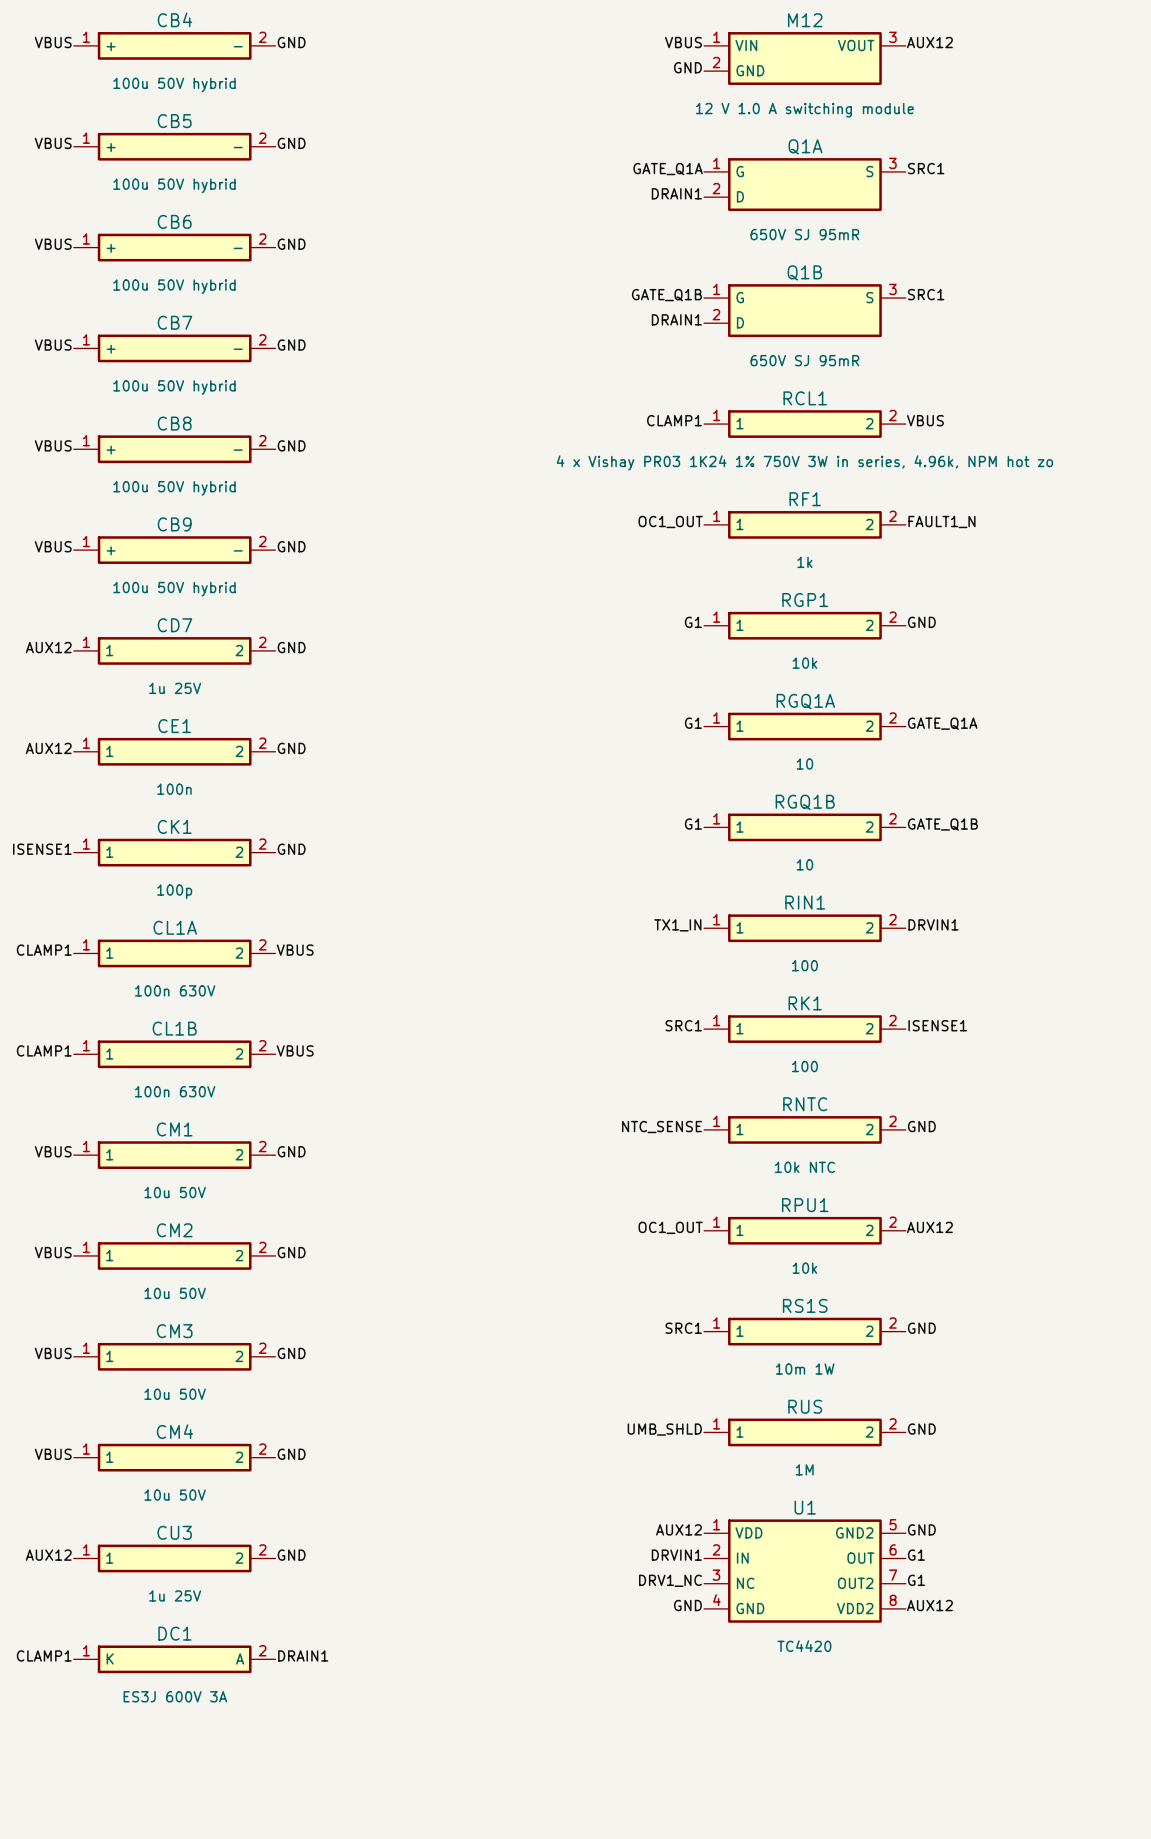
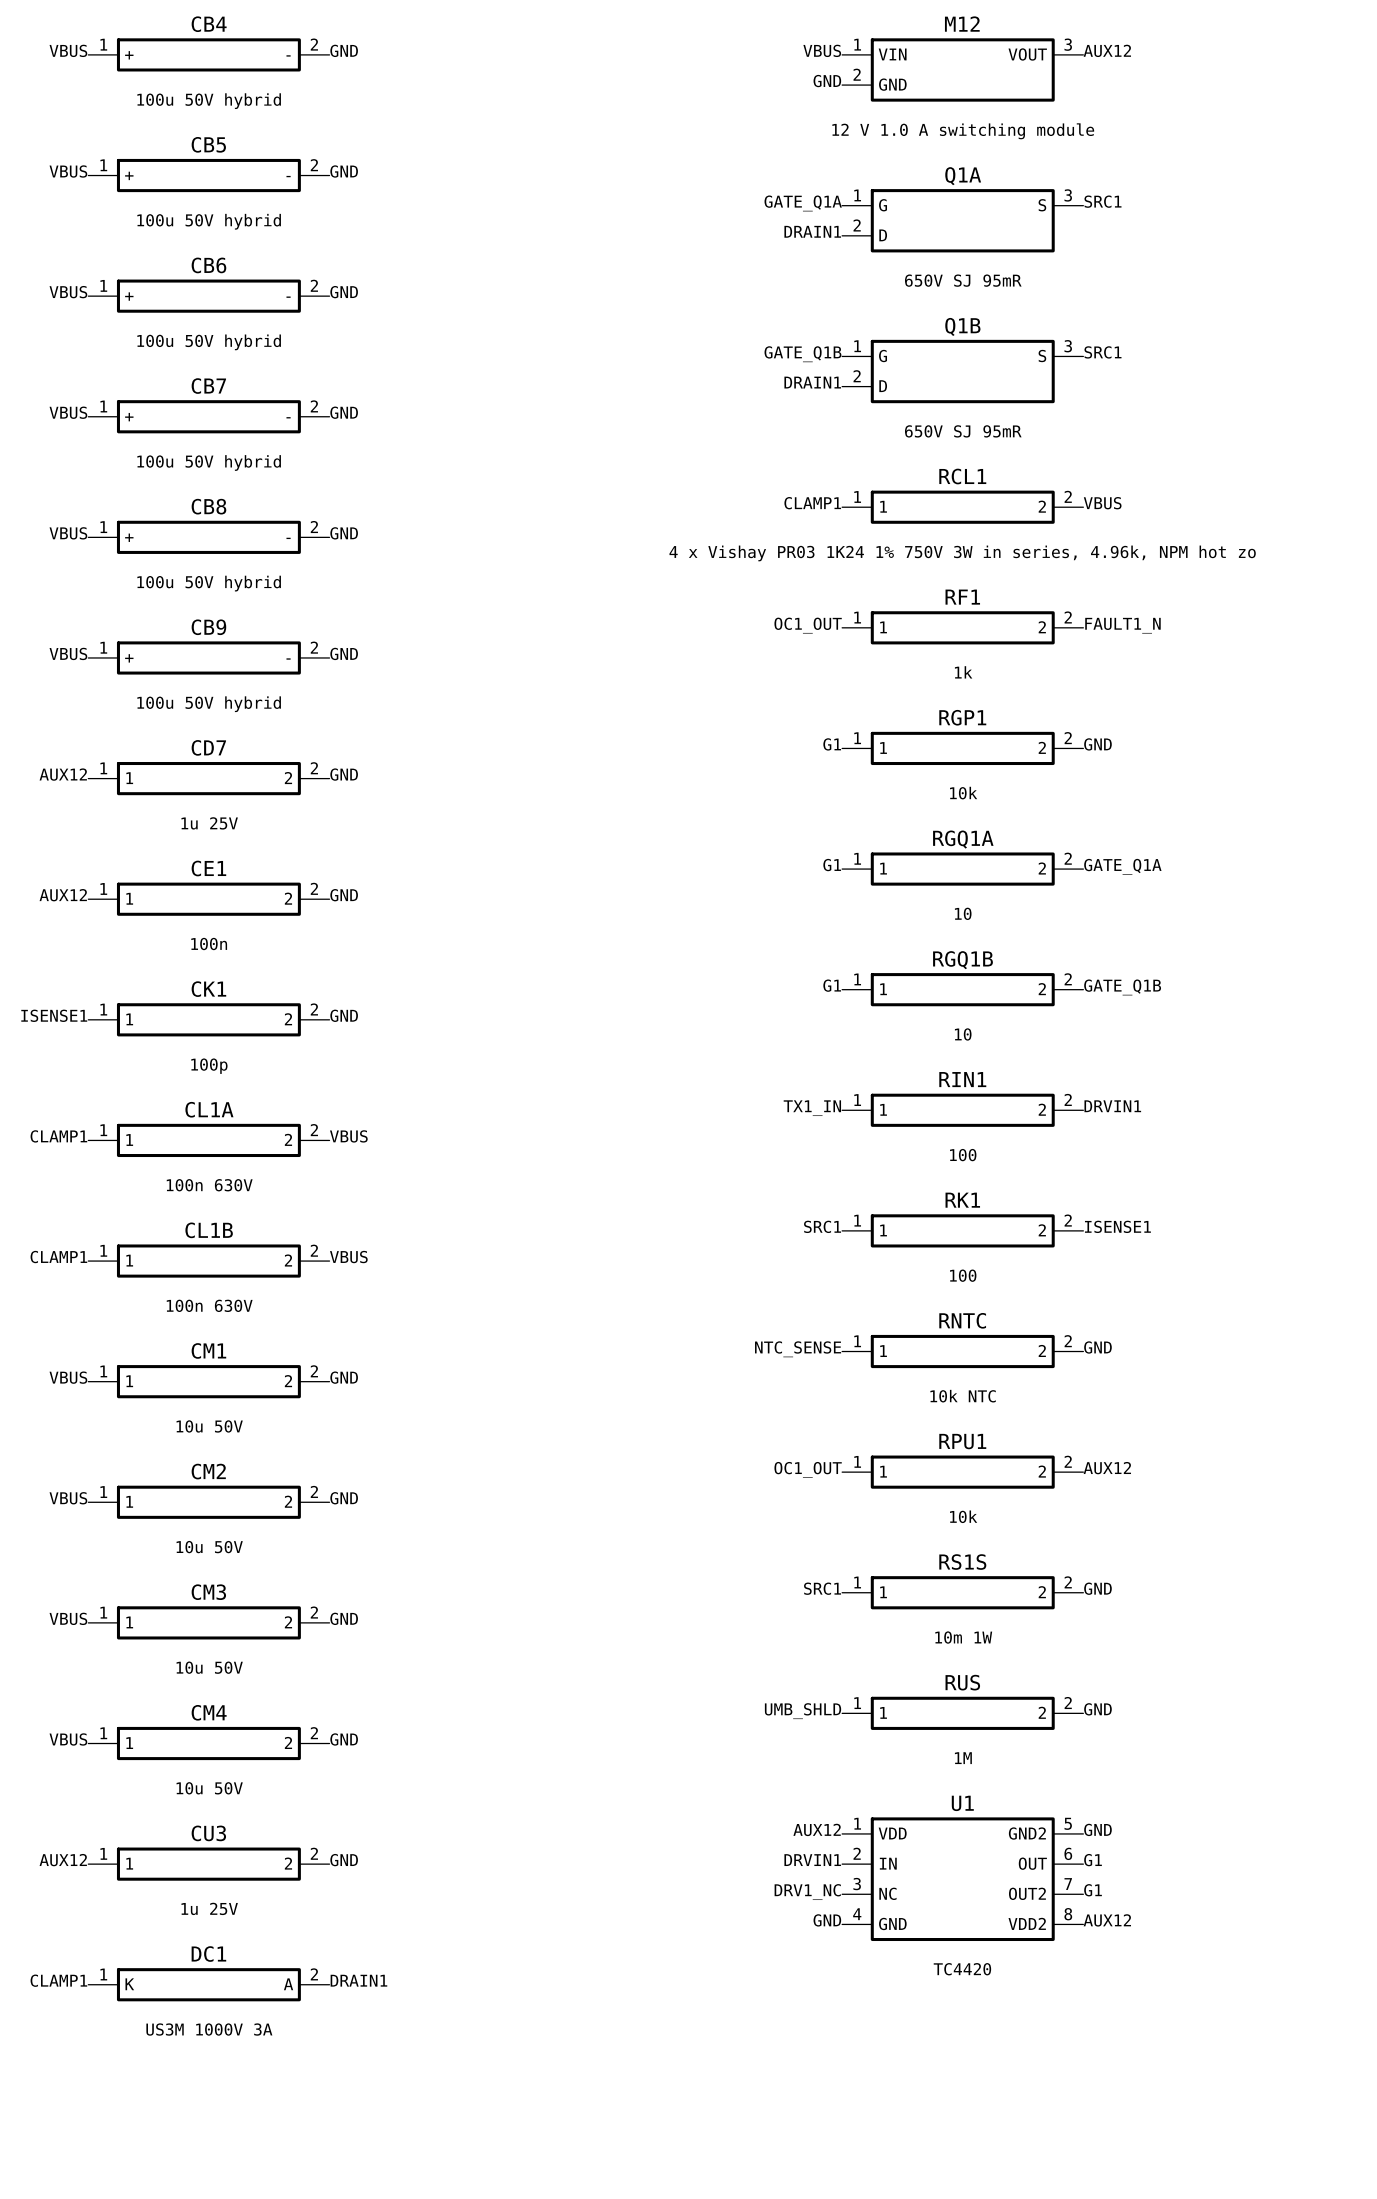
DC1 value: ES3J 600V 3A (175, 1696) -> US3M 1000V 3A (209, 2029)

